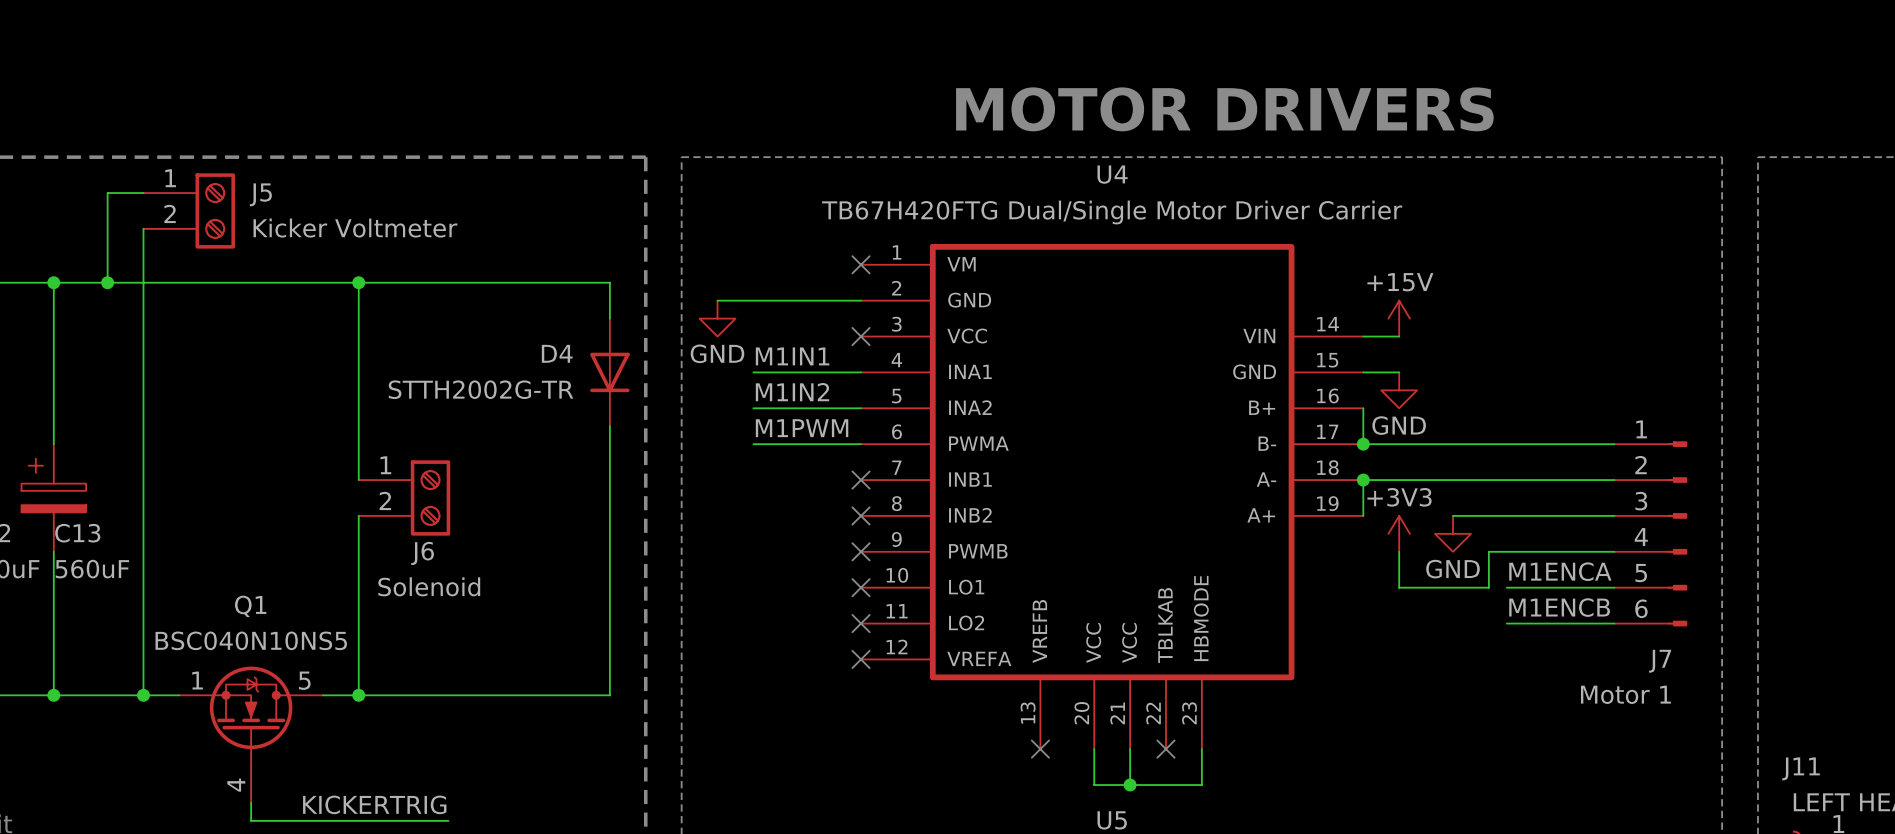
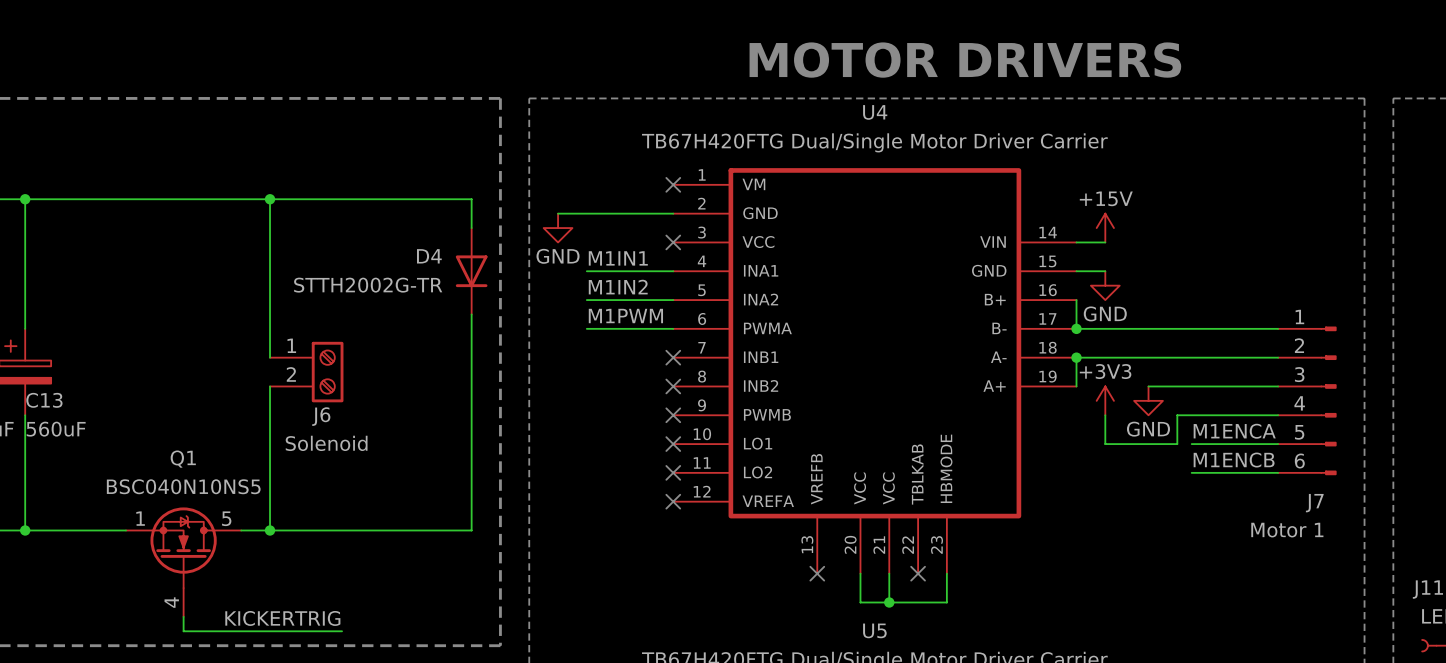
wire: (143, 193) (107, 193) (107, 282) -> none
J5: Kicker Voltmeter (189, 210) -> none
wire: (143, 228) (143, 695) -> none
junction: (107, 282) -> none
junction: (143, 695) -> none

